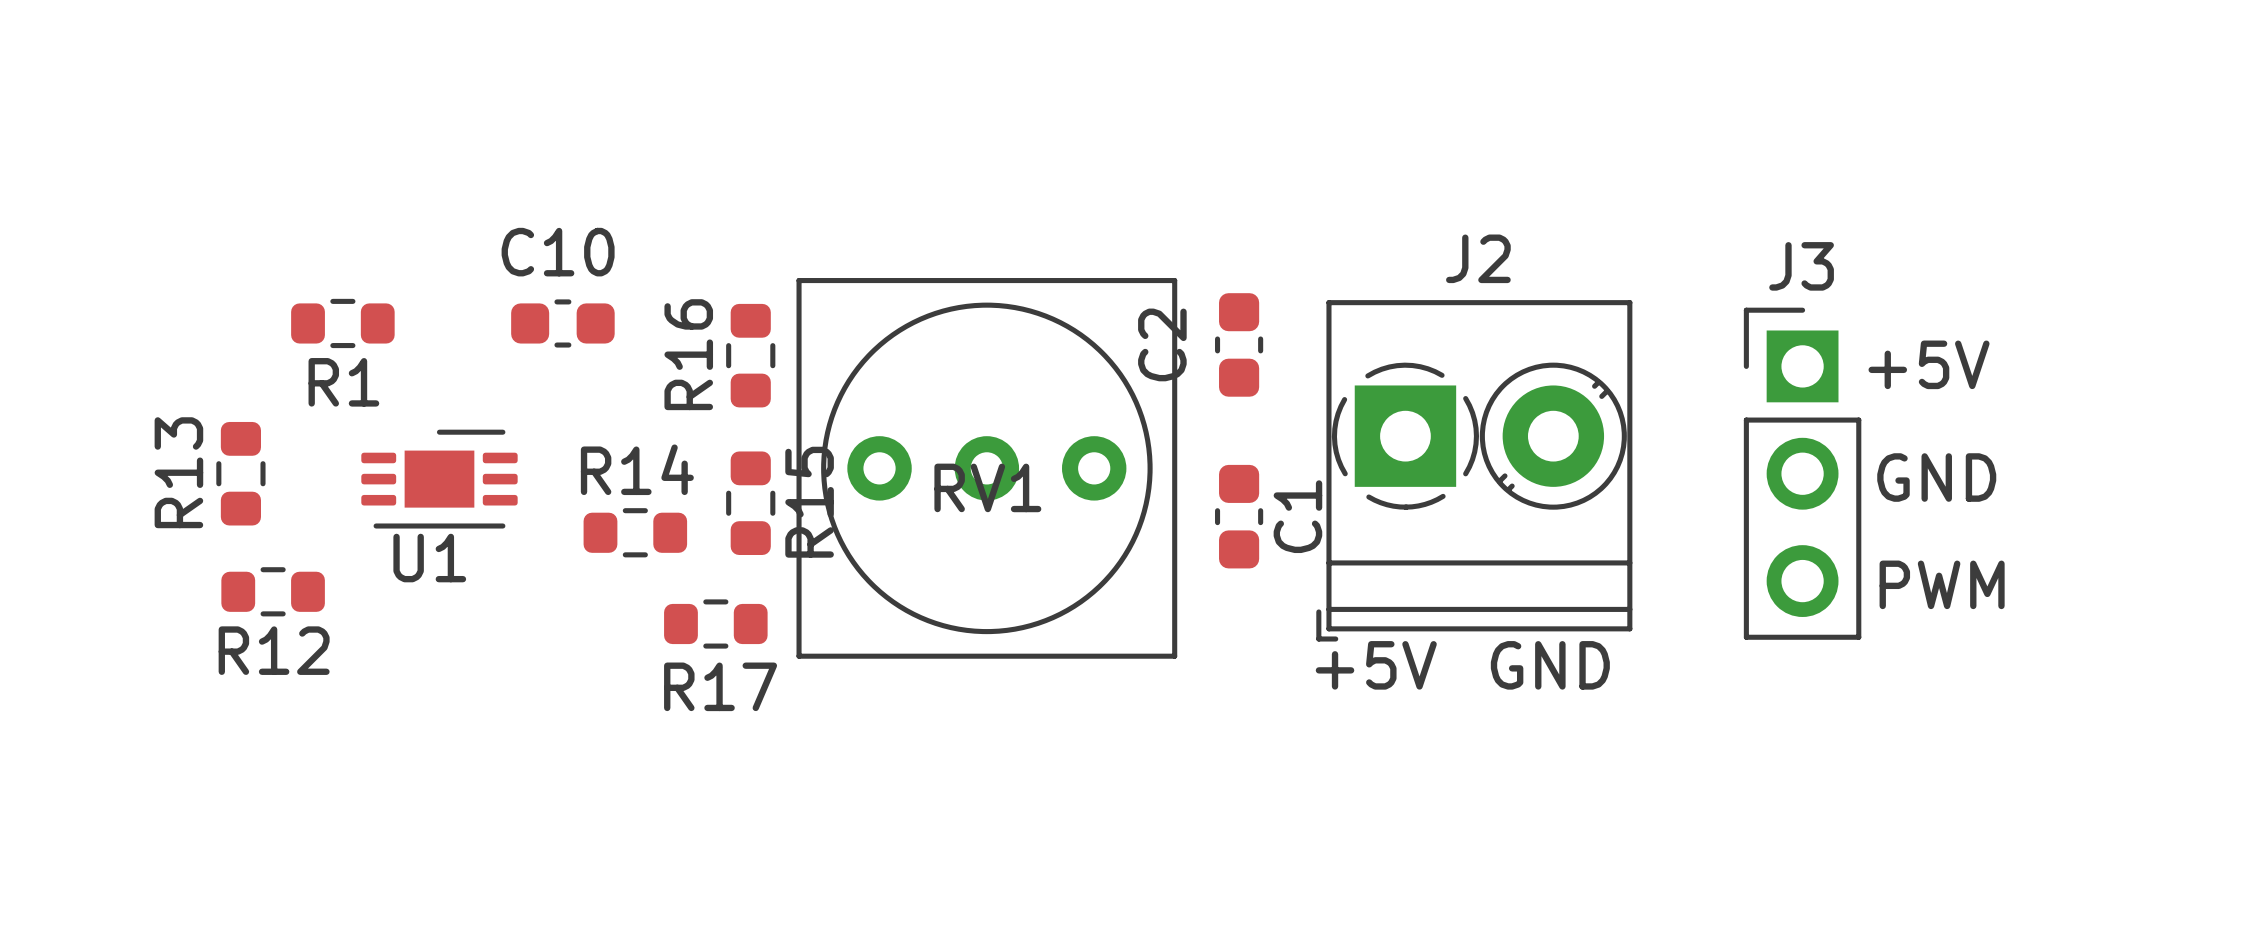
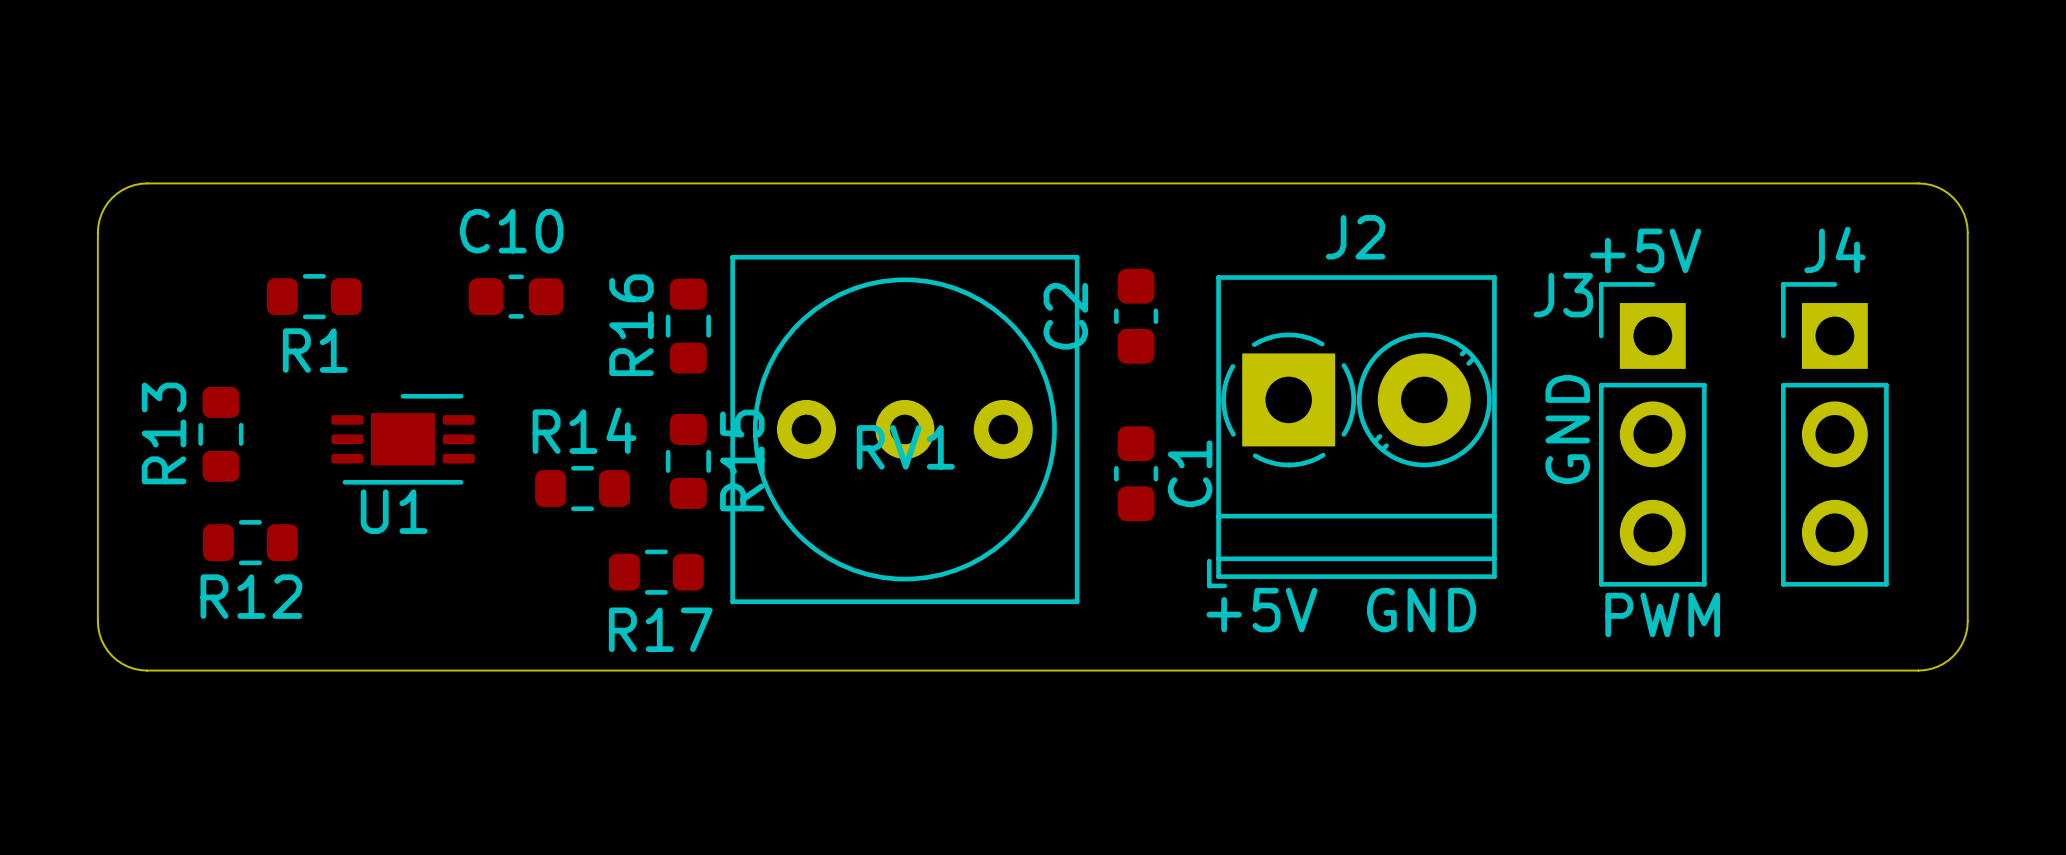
board edge: none -> (147, 183) (1918, 183) (1931, 185) (1943, 190) (1957, 202) (1963, 213) (1967, 226) (1967, 621) (1966, 634) (1961, 645) (1948, 660) (1937, 666) (1918, 670) (147, 670) (134, 668) (122, 663) (108, 651) (101, 640) (98, 627) (97, 232) (101, 213) (112, 197) (128, 187) (147, 183)
J3 name position: J3 (1801, 266) -> J3 (1563, 295)
text position: +5V (1929, 364) -> +5V (1645, 250)
J4: none -> (1834, 434)
text rotation: 0° (1936, 477) -> 90° counterclockwise (1567, 429)
text position: GND (1936, 477) -> GND (1567, 429)
text position: PWM (1942, 584) -> PWM (1662, 614)

